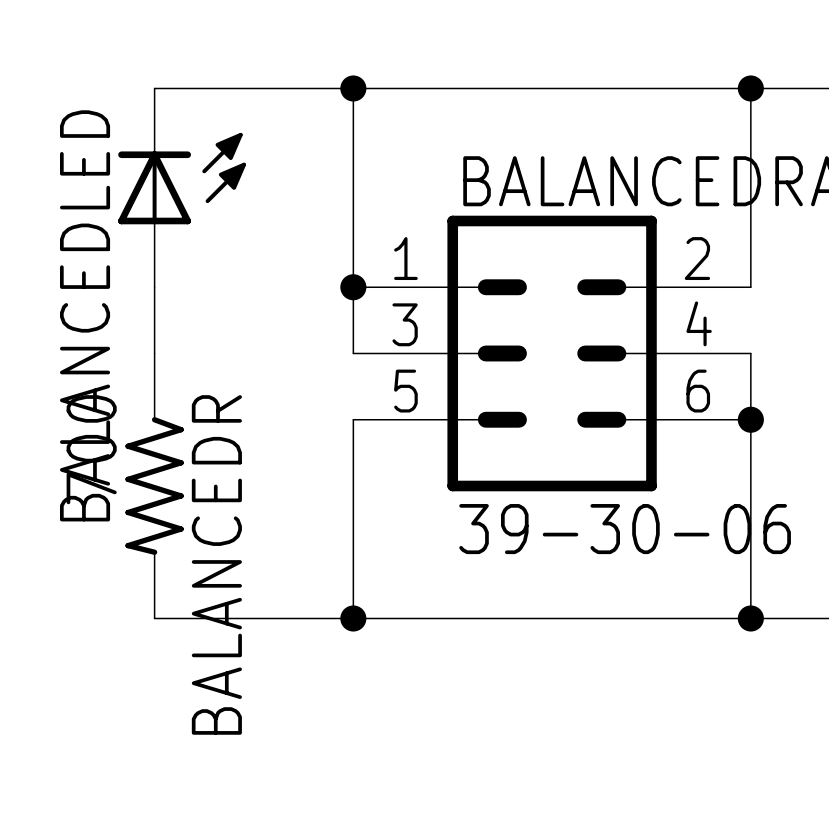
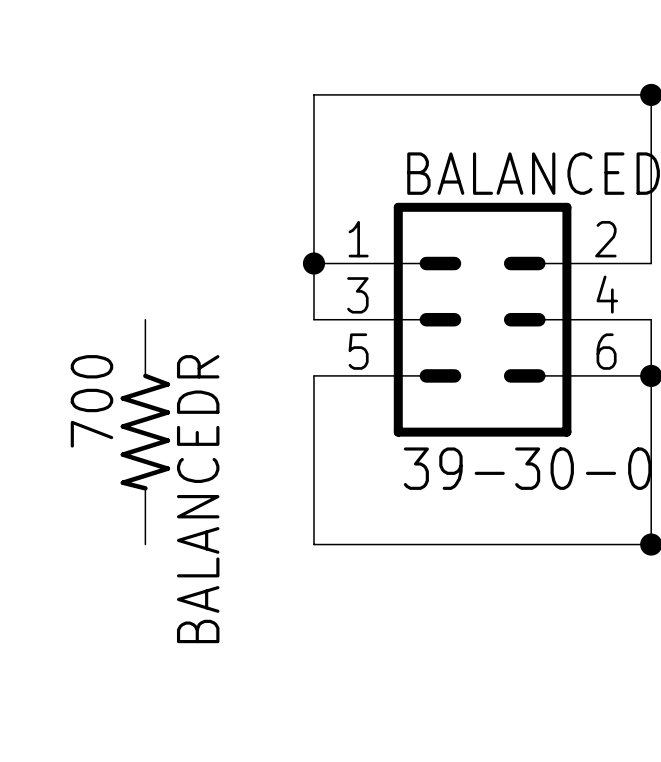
wire: (154, 88) (353, 88) -> none
junction: (353, 88) -> none
BALANCEDLED: (182, 187) -> none
wire: (154, 287) (154, 353) -> none
wire: (154, 618) (353, 618) -> none
junction: (353, 618) -> none

